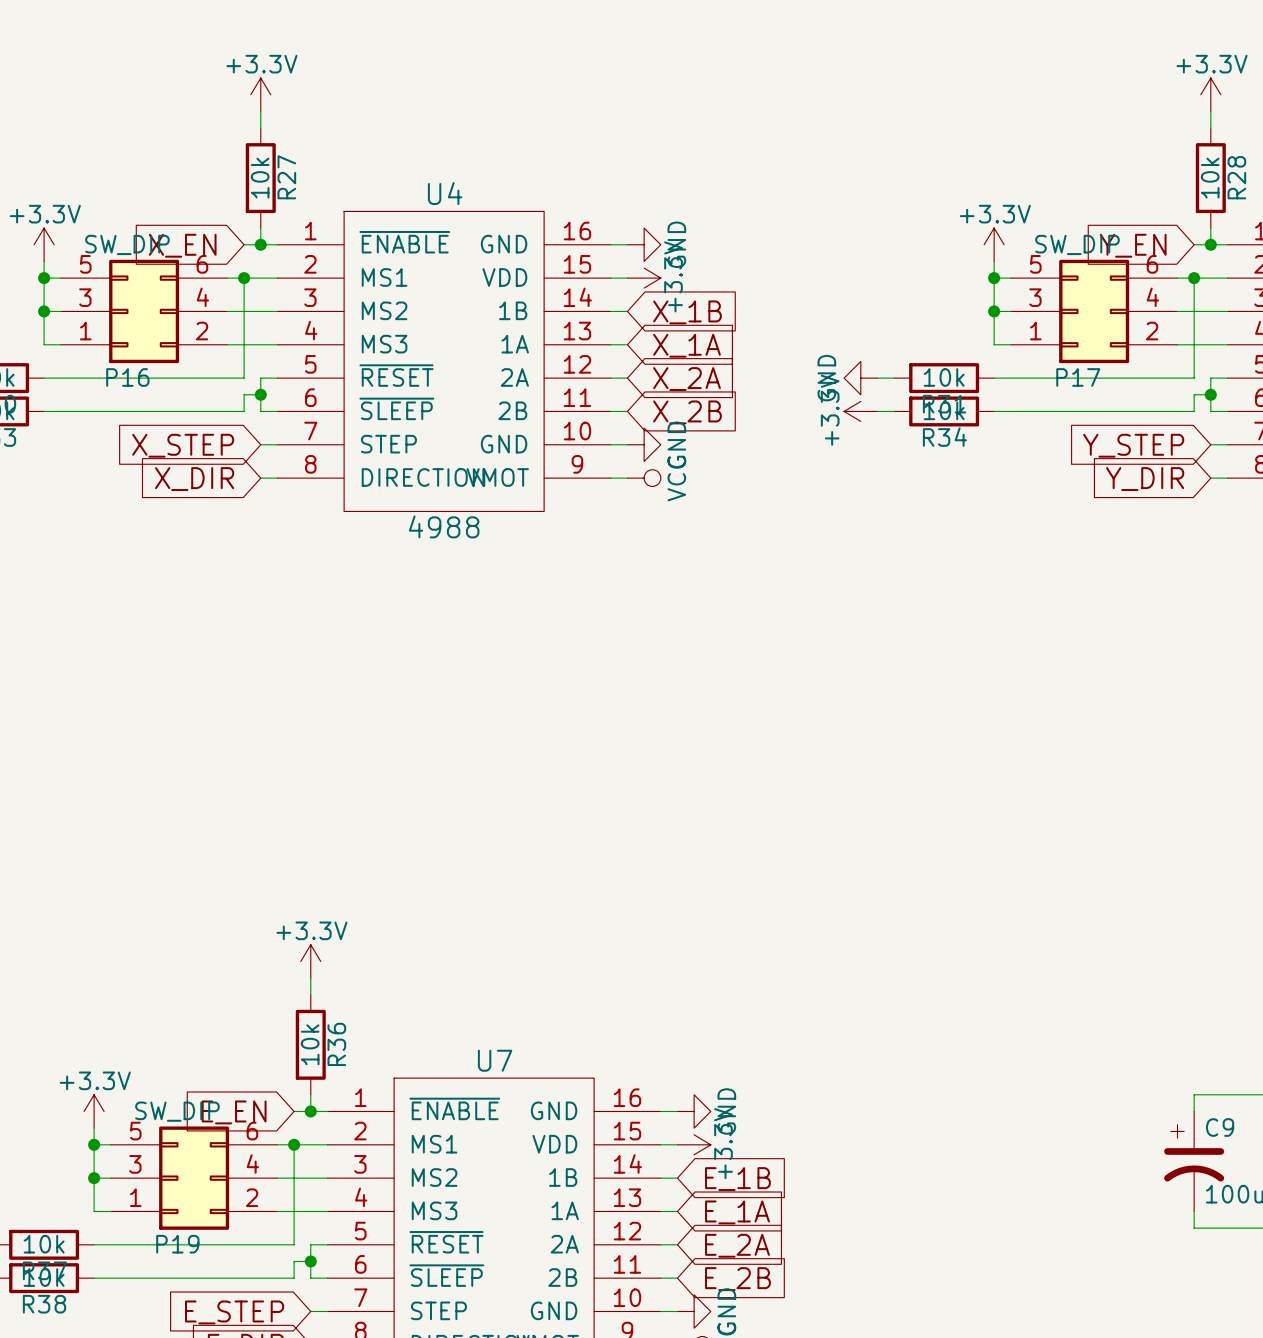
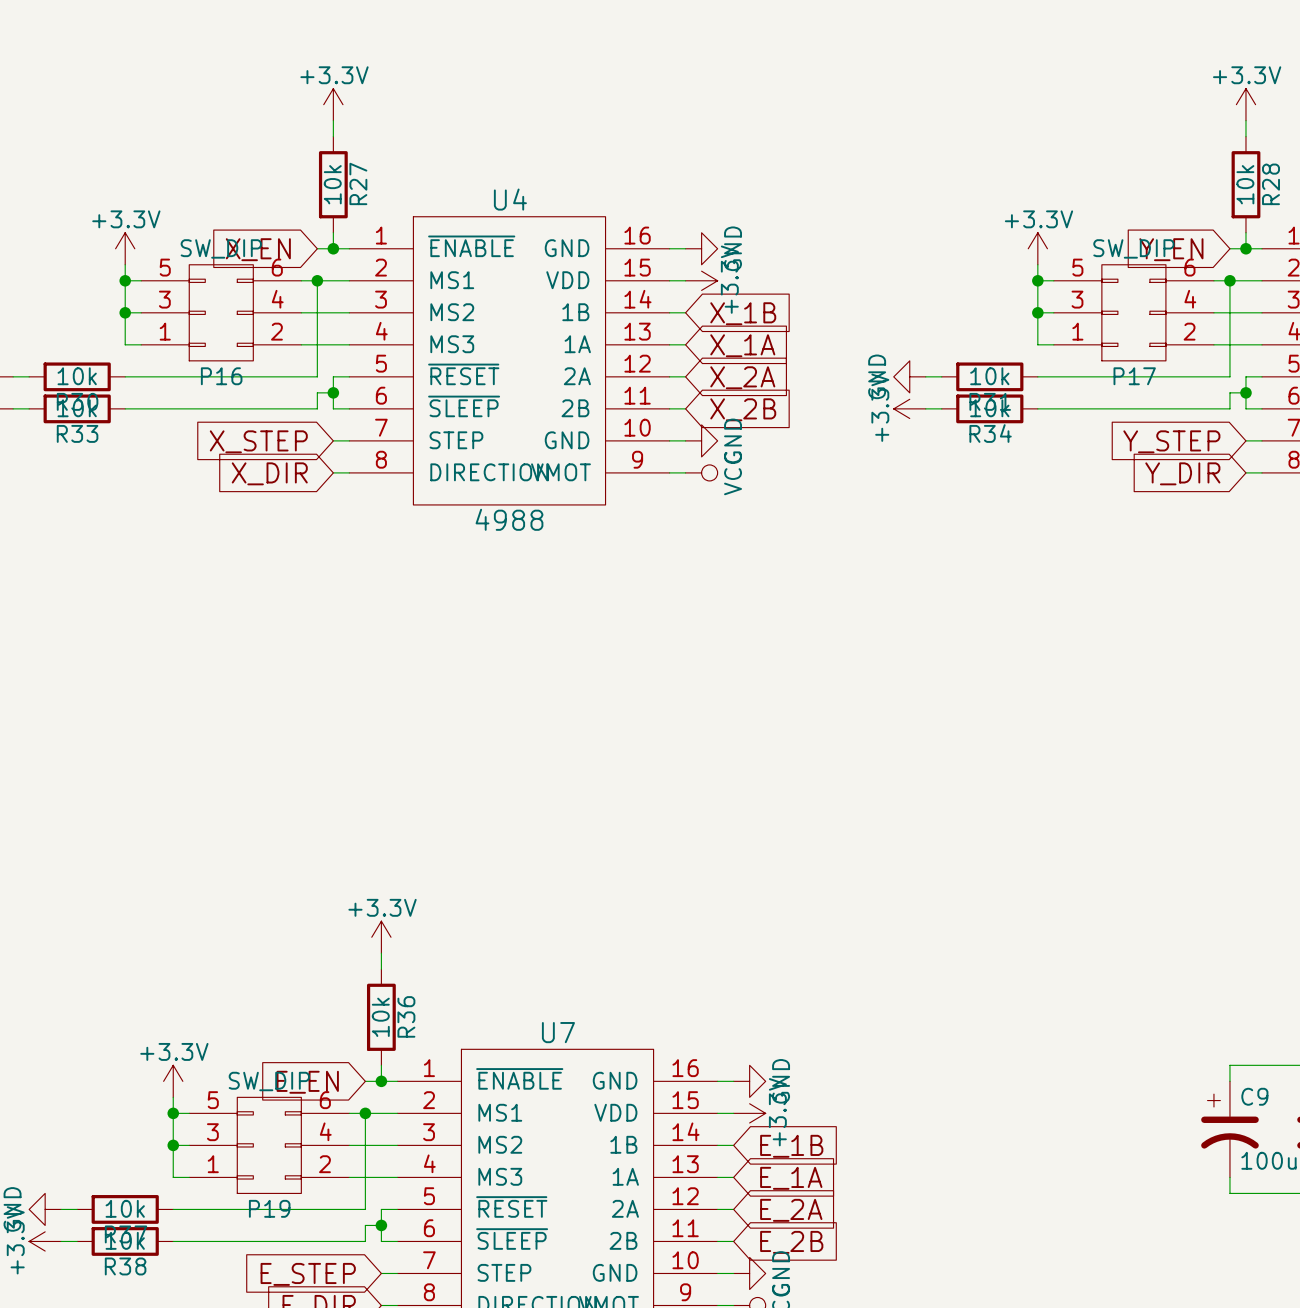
P16 symbol: [60, 259, 228, 364] -> [141, 264, 302, 361]
P17 symbol: [1010, 259, 1178, 364] -> [1053, 264, 1214, 361]
P19 symbol: [110, 1126, 278, 1230] -> [189, 1097, 350, 1194]

